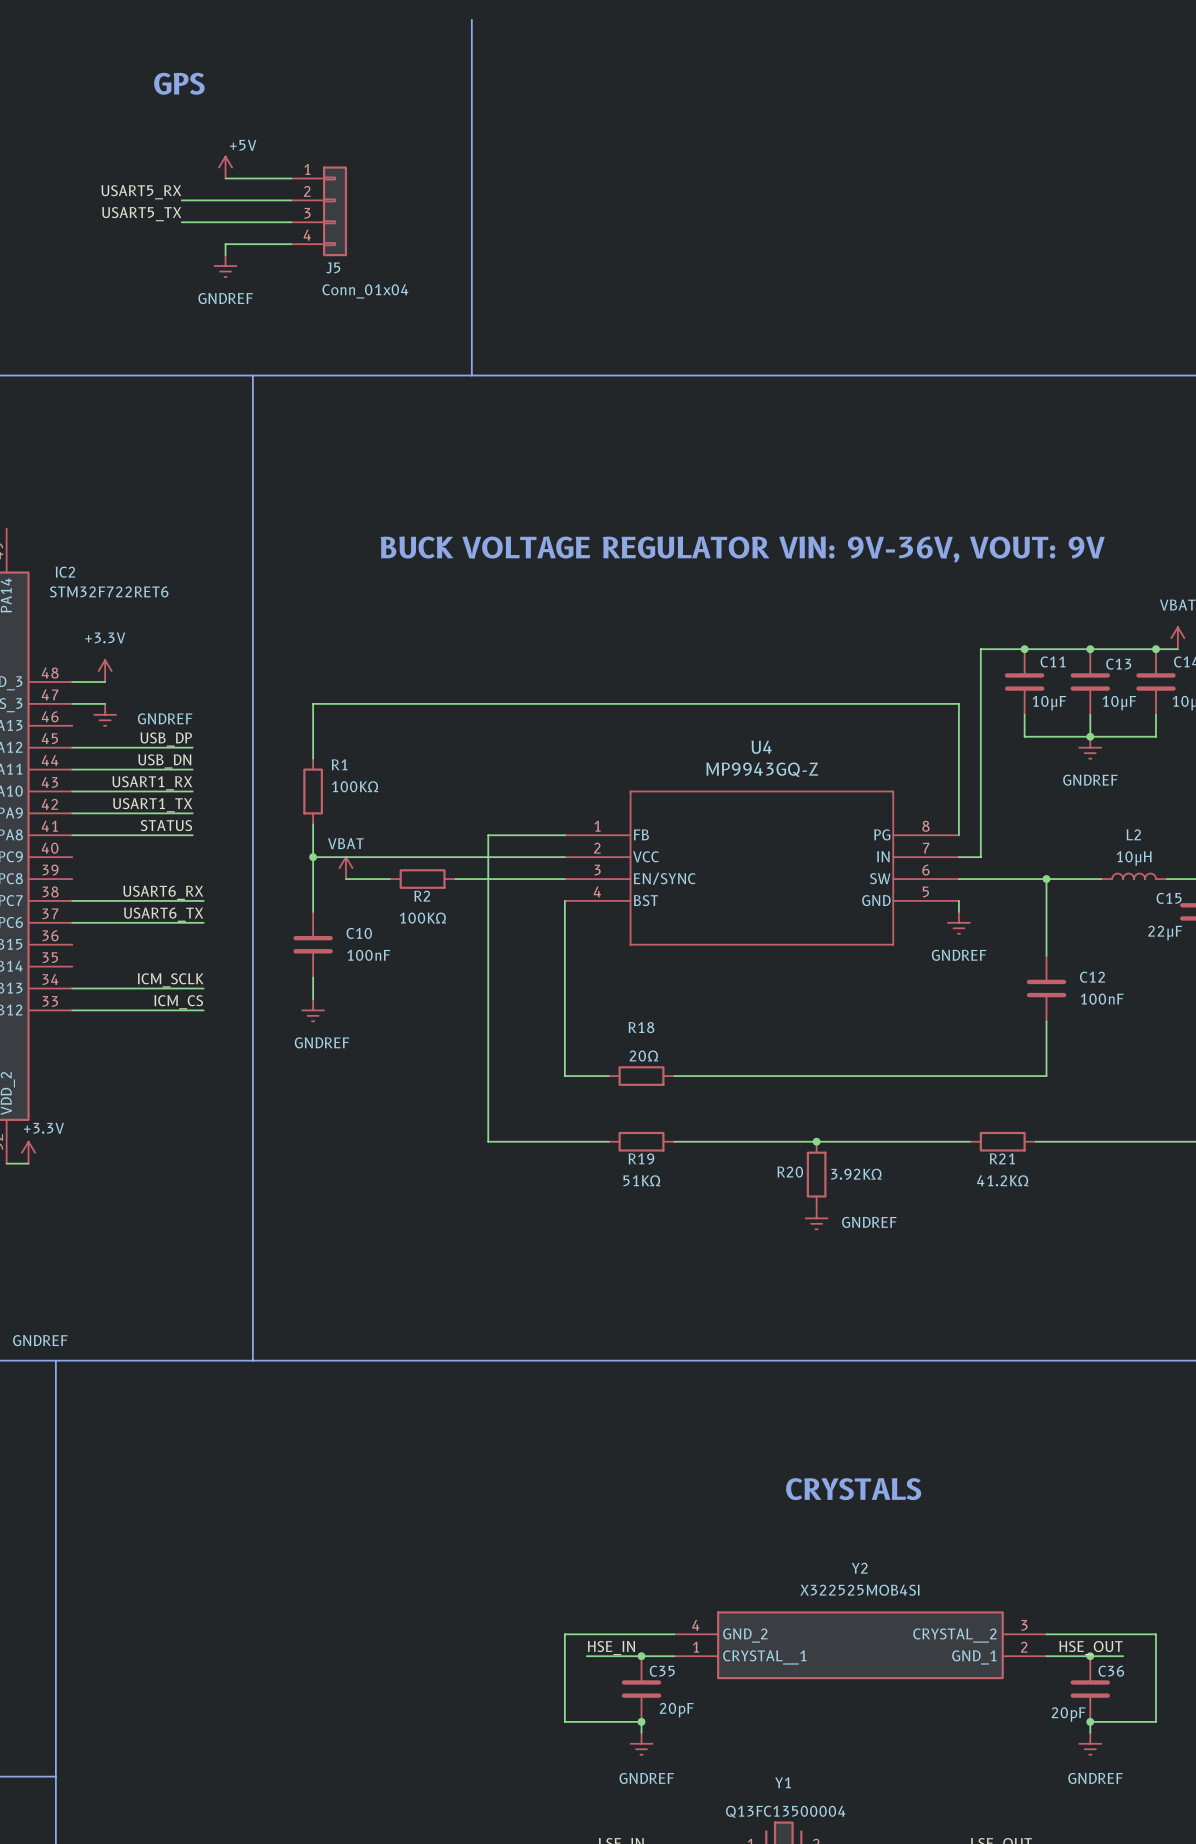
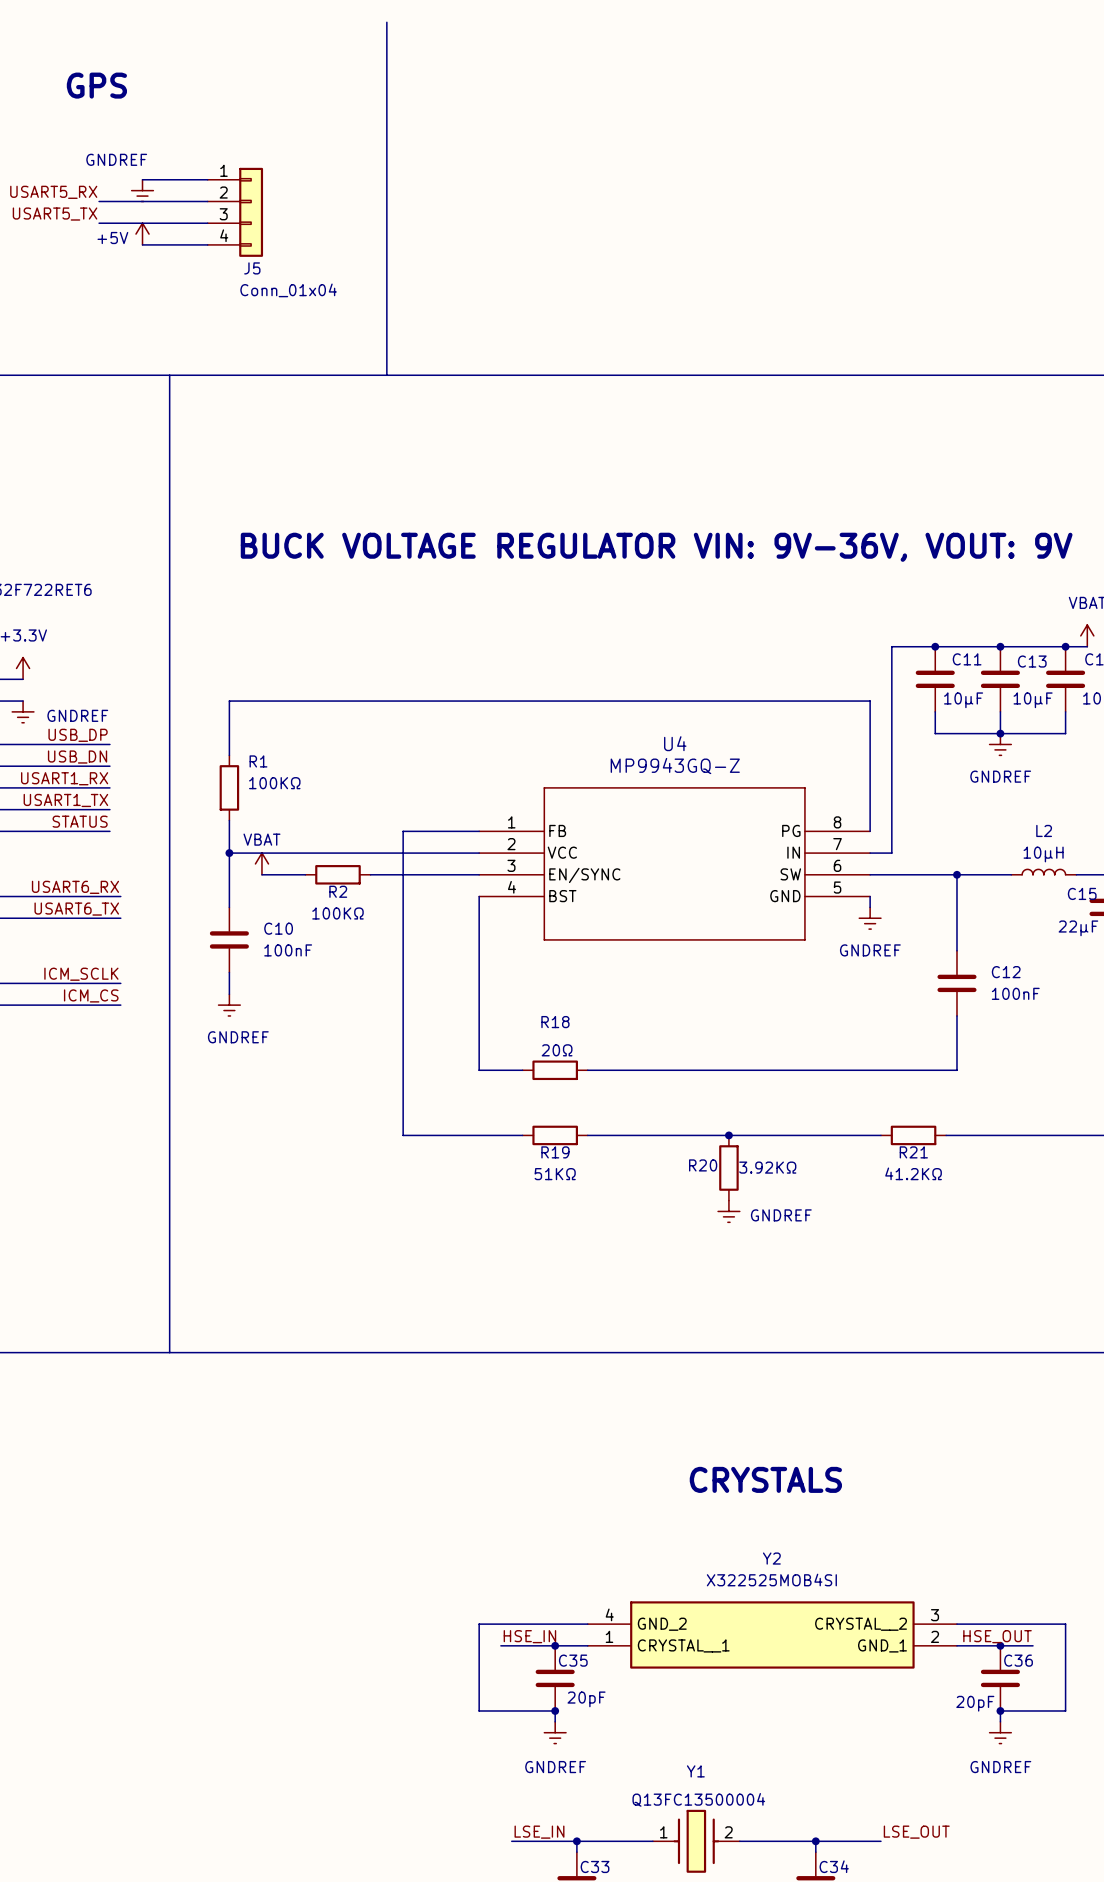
power symbol text position: +5V (243, 145) -> +5V (112, 238)
power symbol position: +5V (225, 167) -> +5V (142, 234)
wire: (225, 244) (225, 255) -> none
power symbol position: GNDREF (225, 266) -> GNDREF (142, 190)
power symbol text position: GNDREF (225, 298) -> GNDREF (116, 159)

